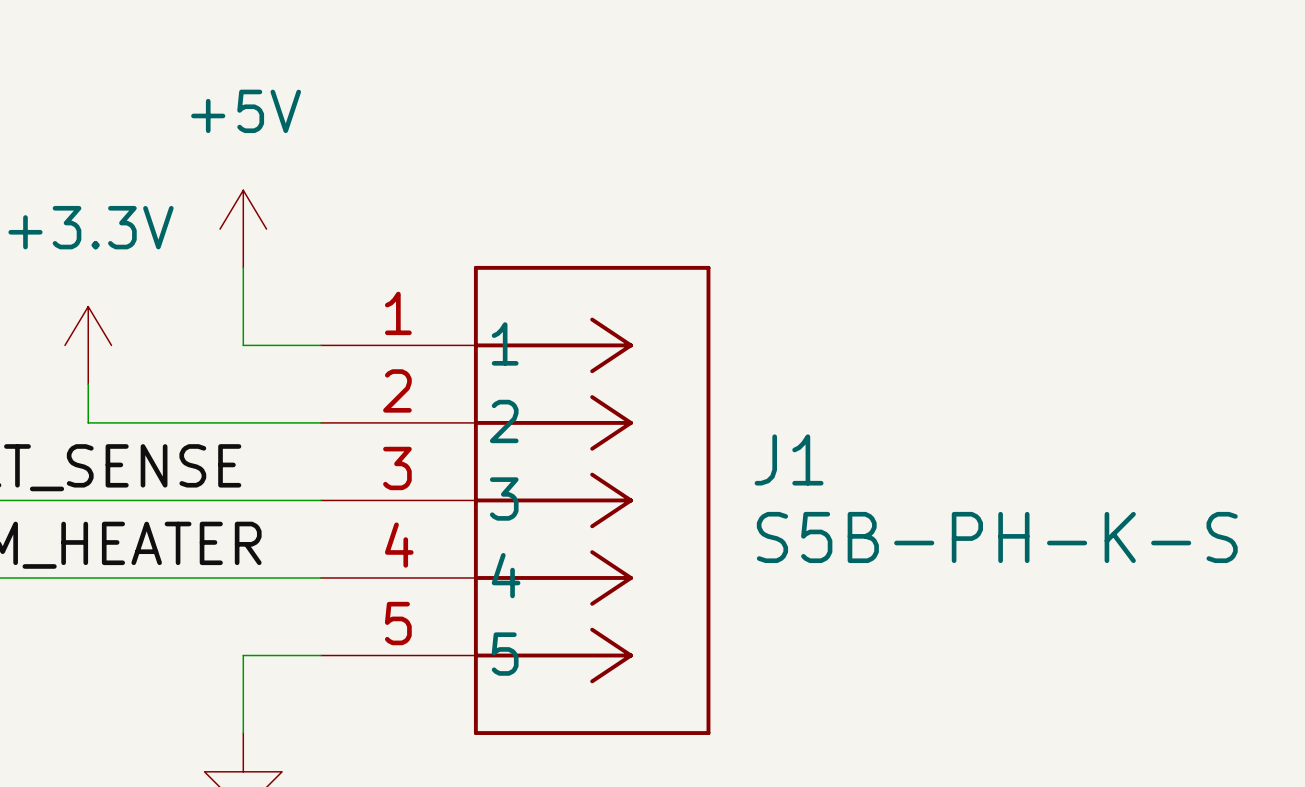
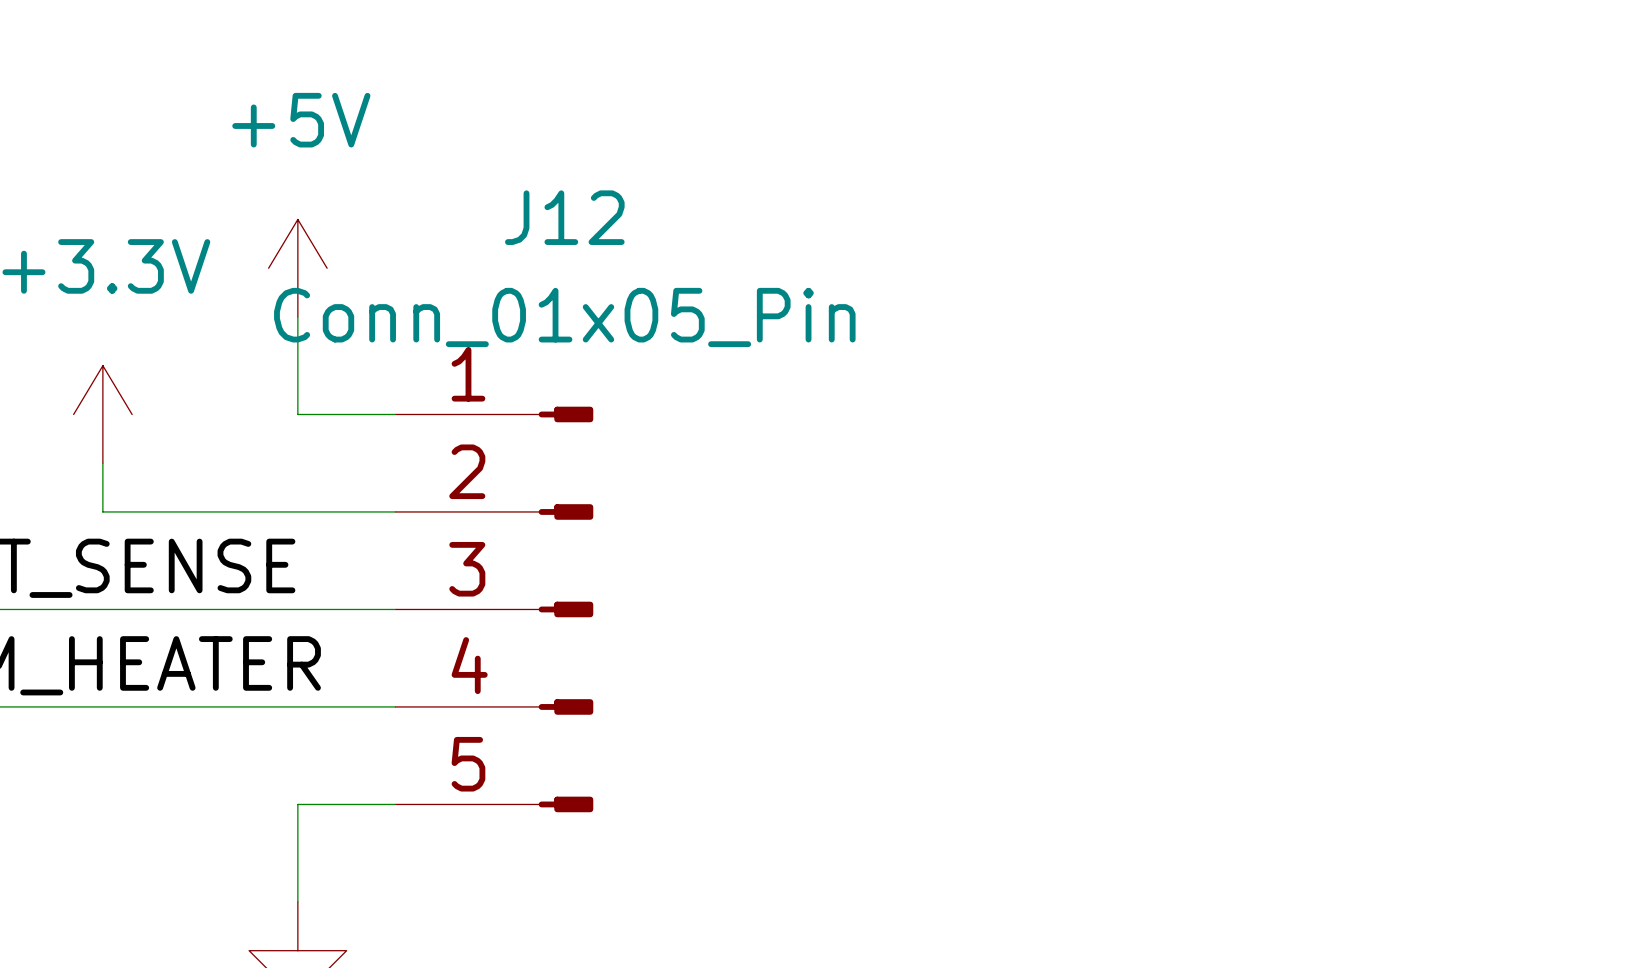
J12: none -> Conn_01x05_Pin (494, 609)
J1: S5B-PH-K-S (515, 500) -> none

